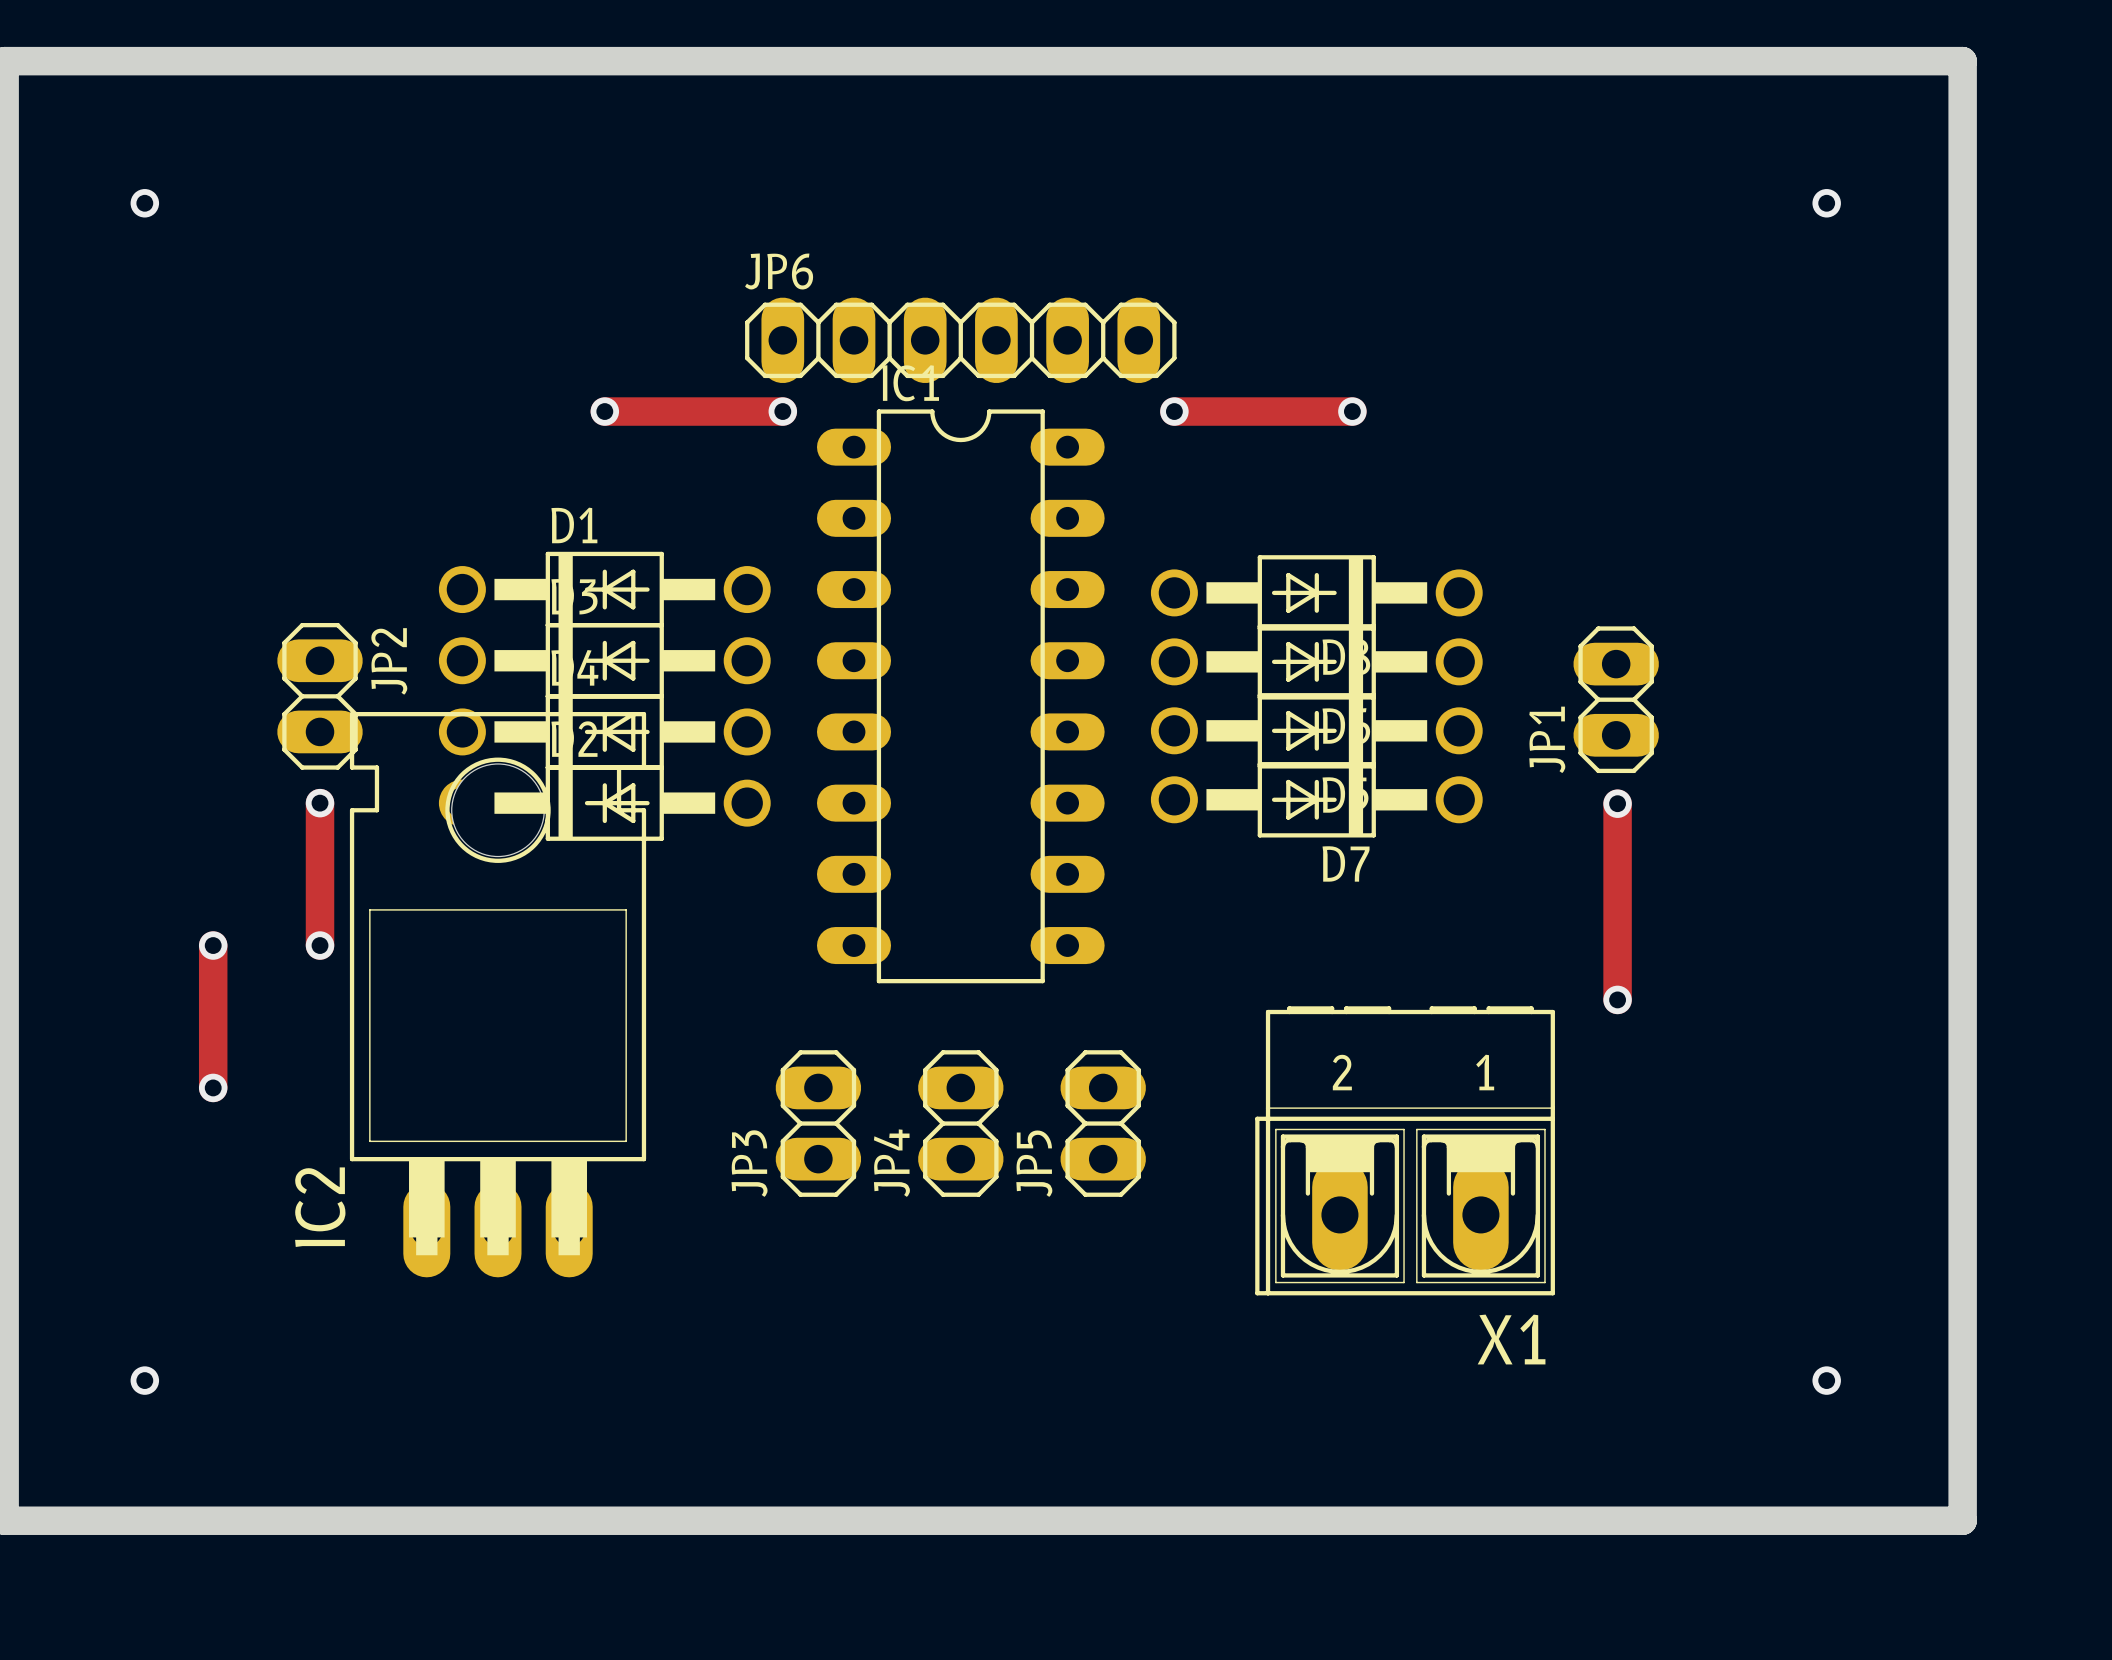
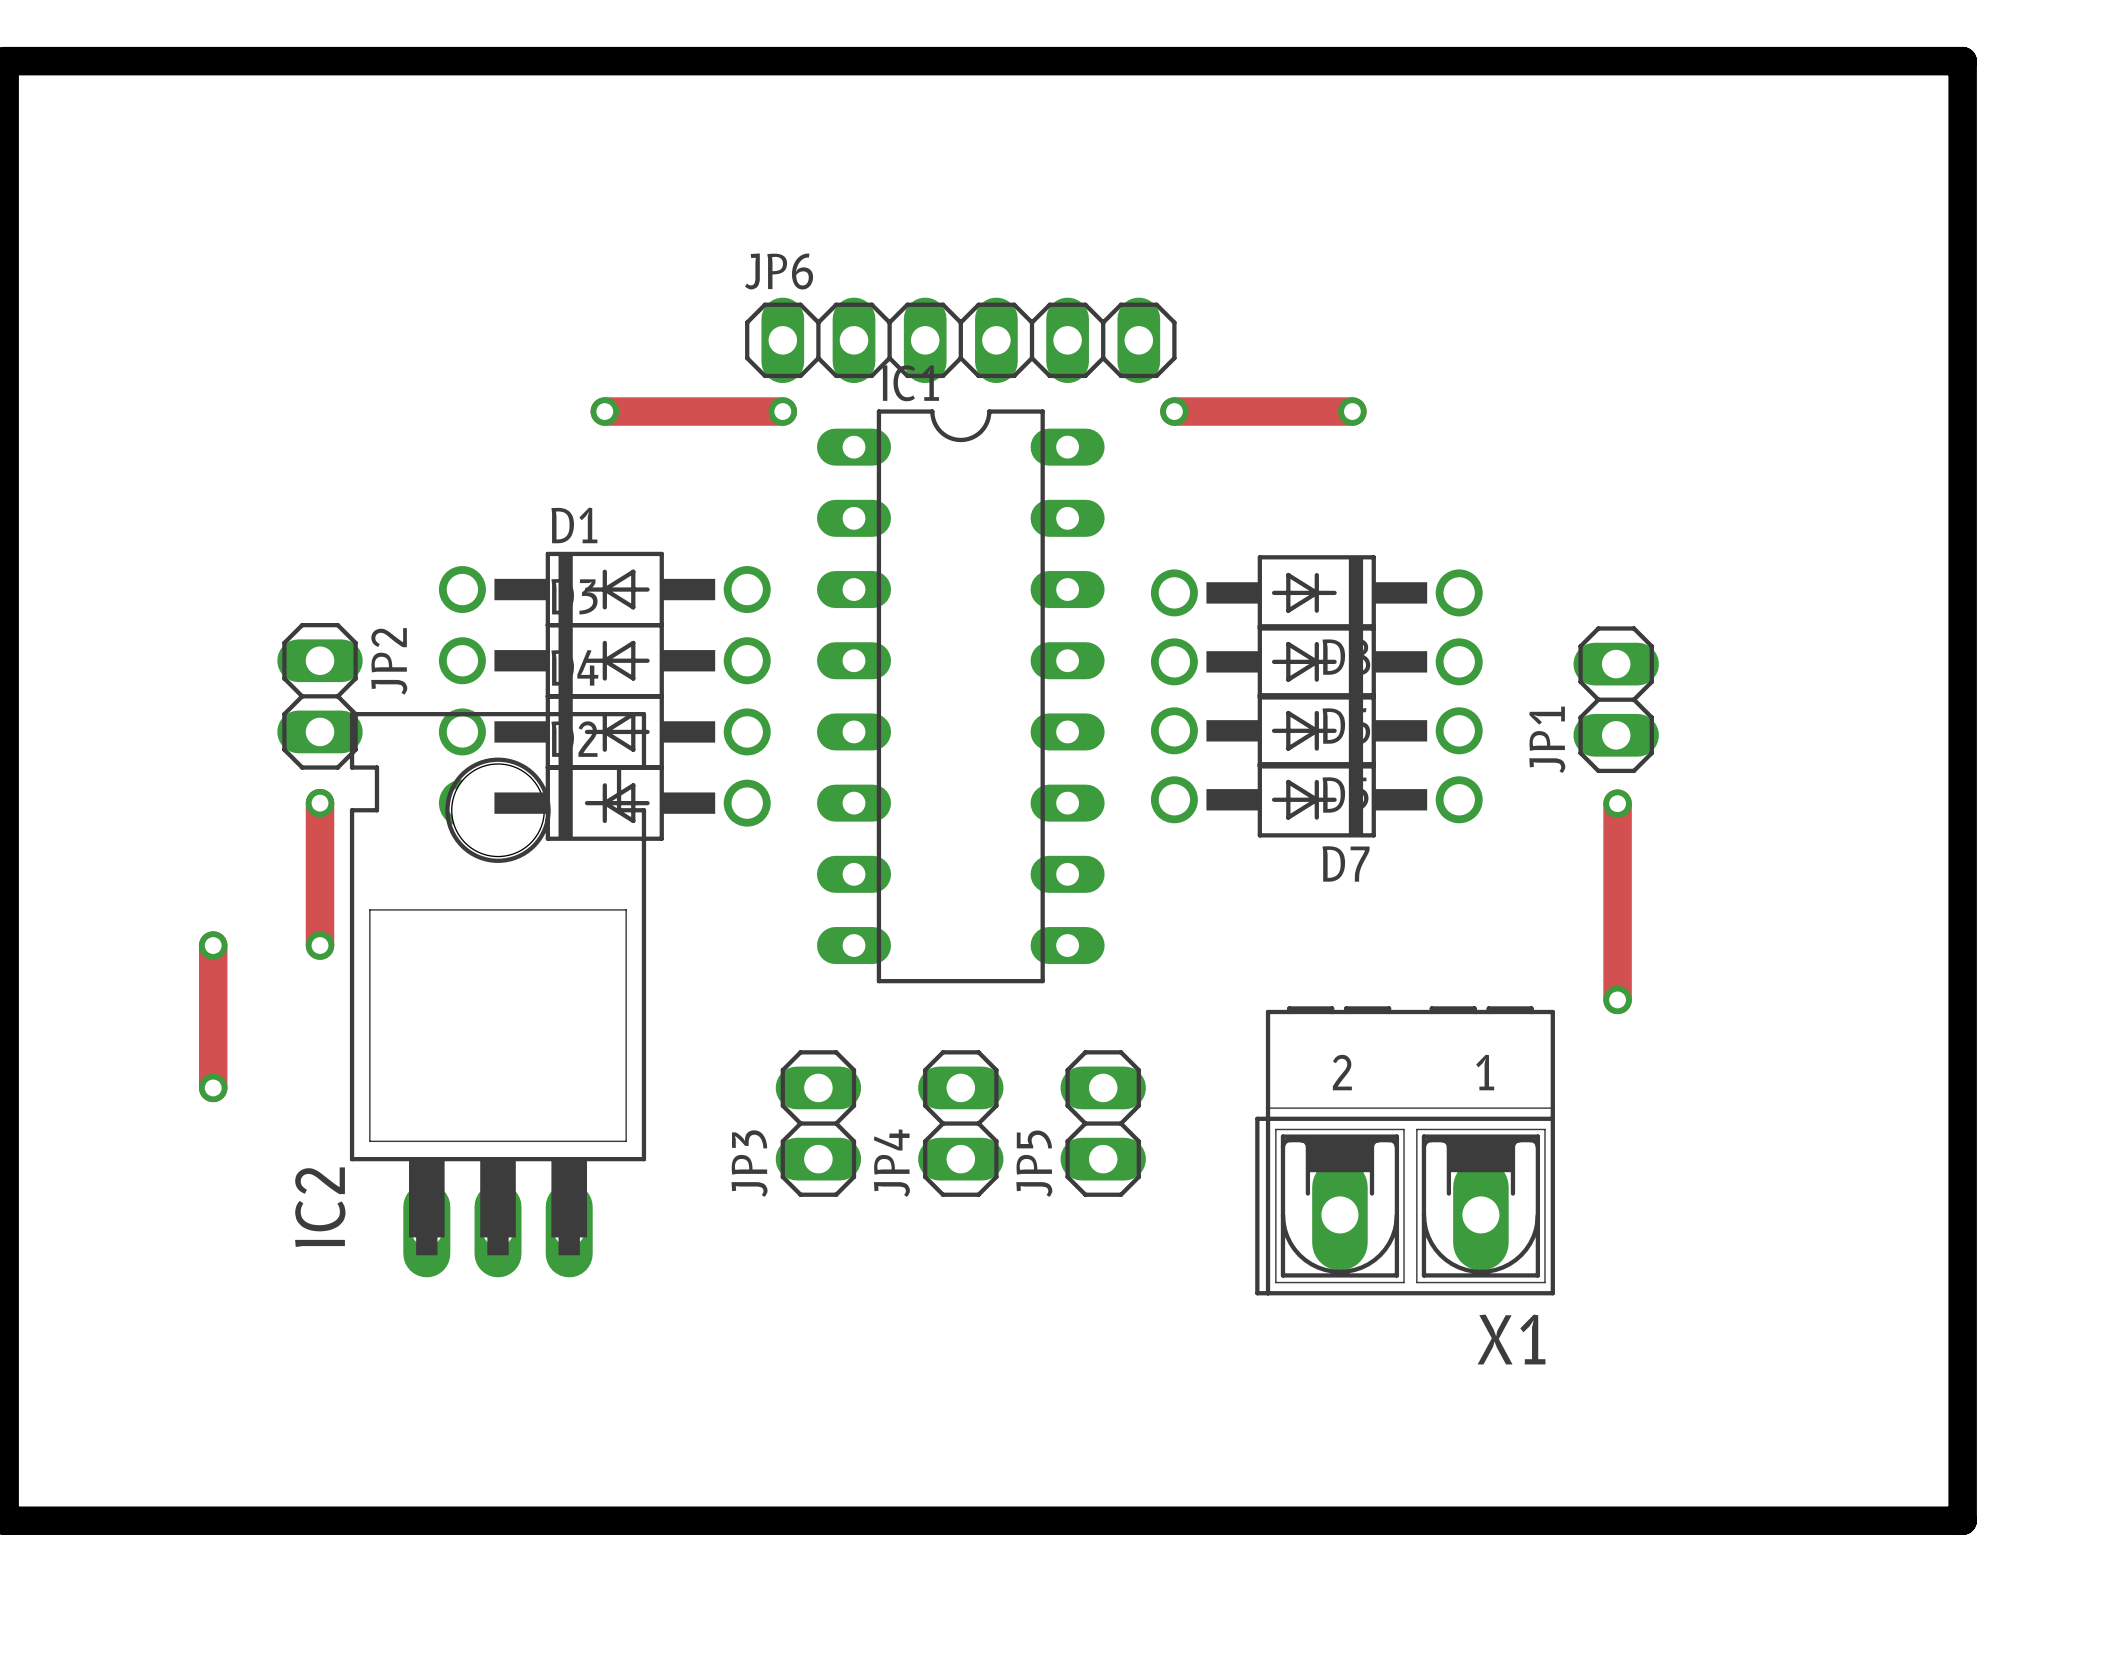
via: (144, 203) -> none
via: (1826, 203) -> none
via: (144, 1380) -> none
via: (1826, 1380) -> none

